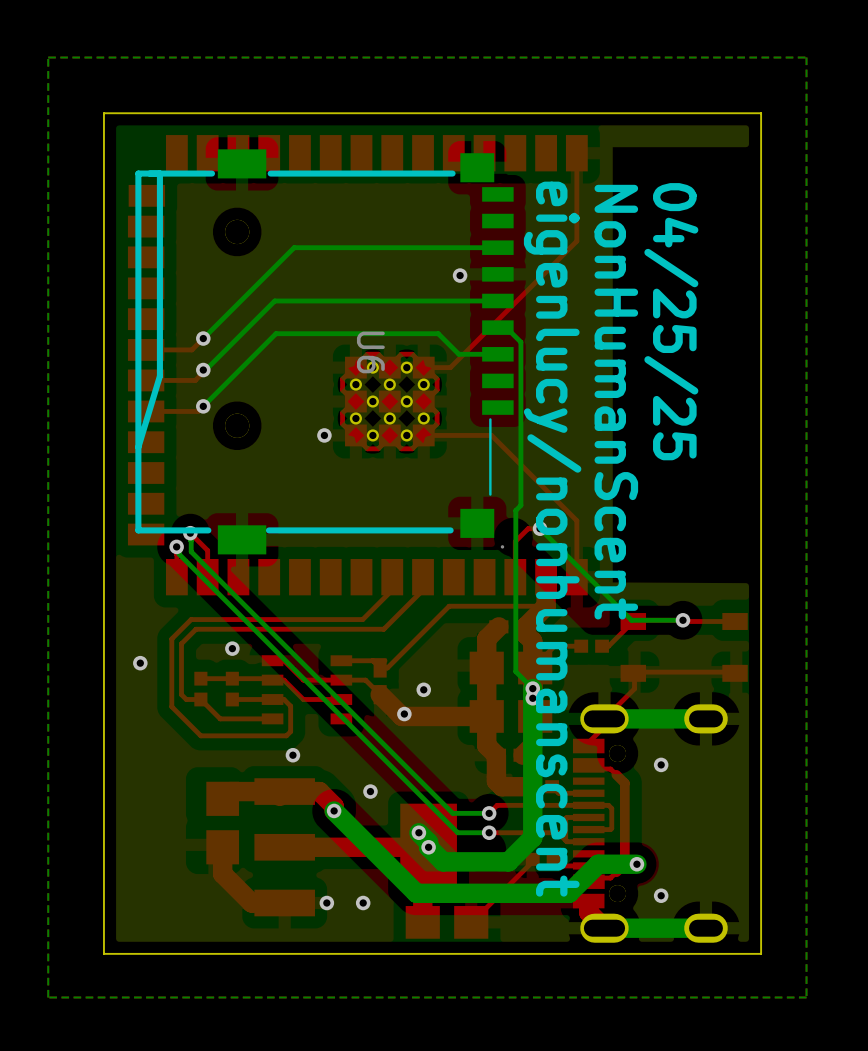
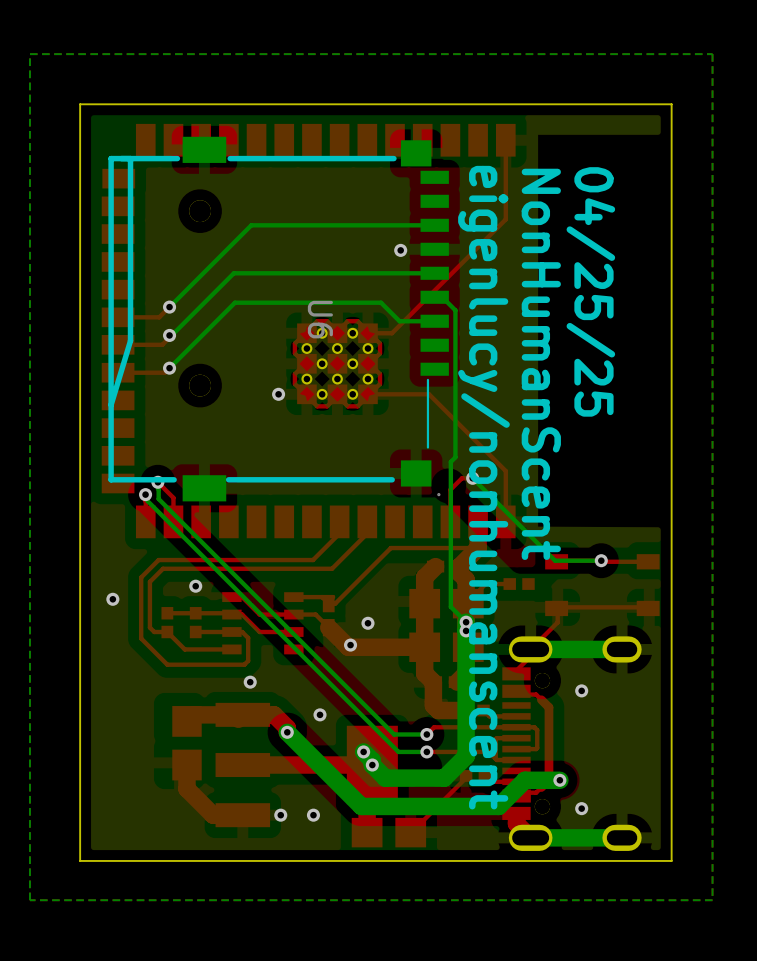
top track: (633, 621) (608, 646) (602, 646) -> none

